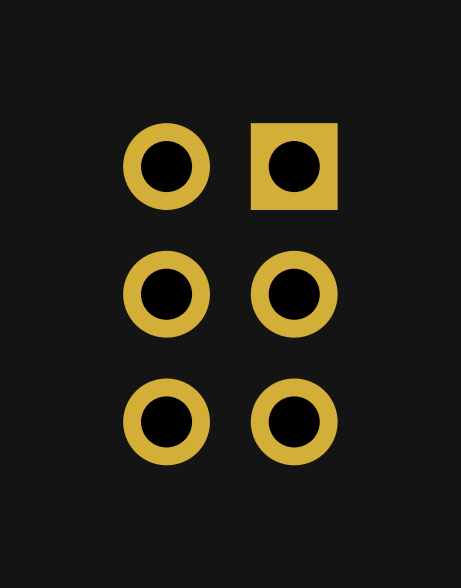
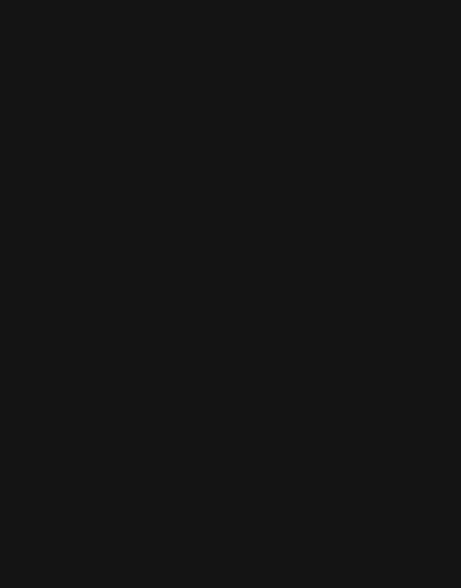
part: (230, 294) -> none

